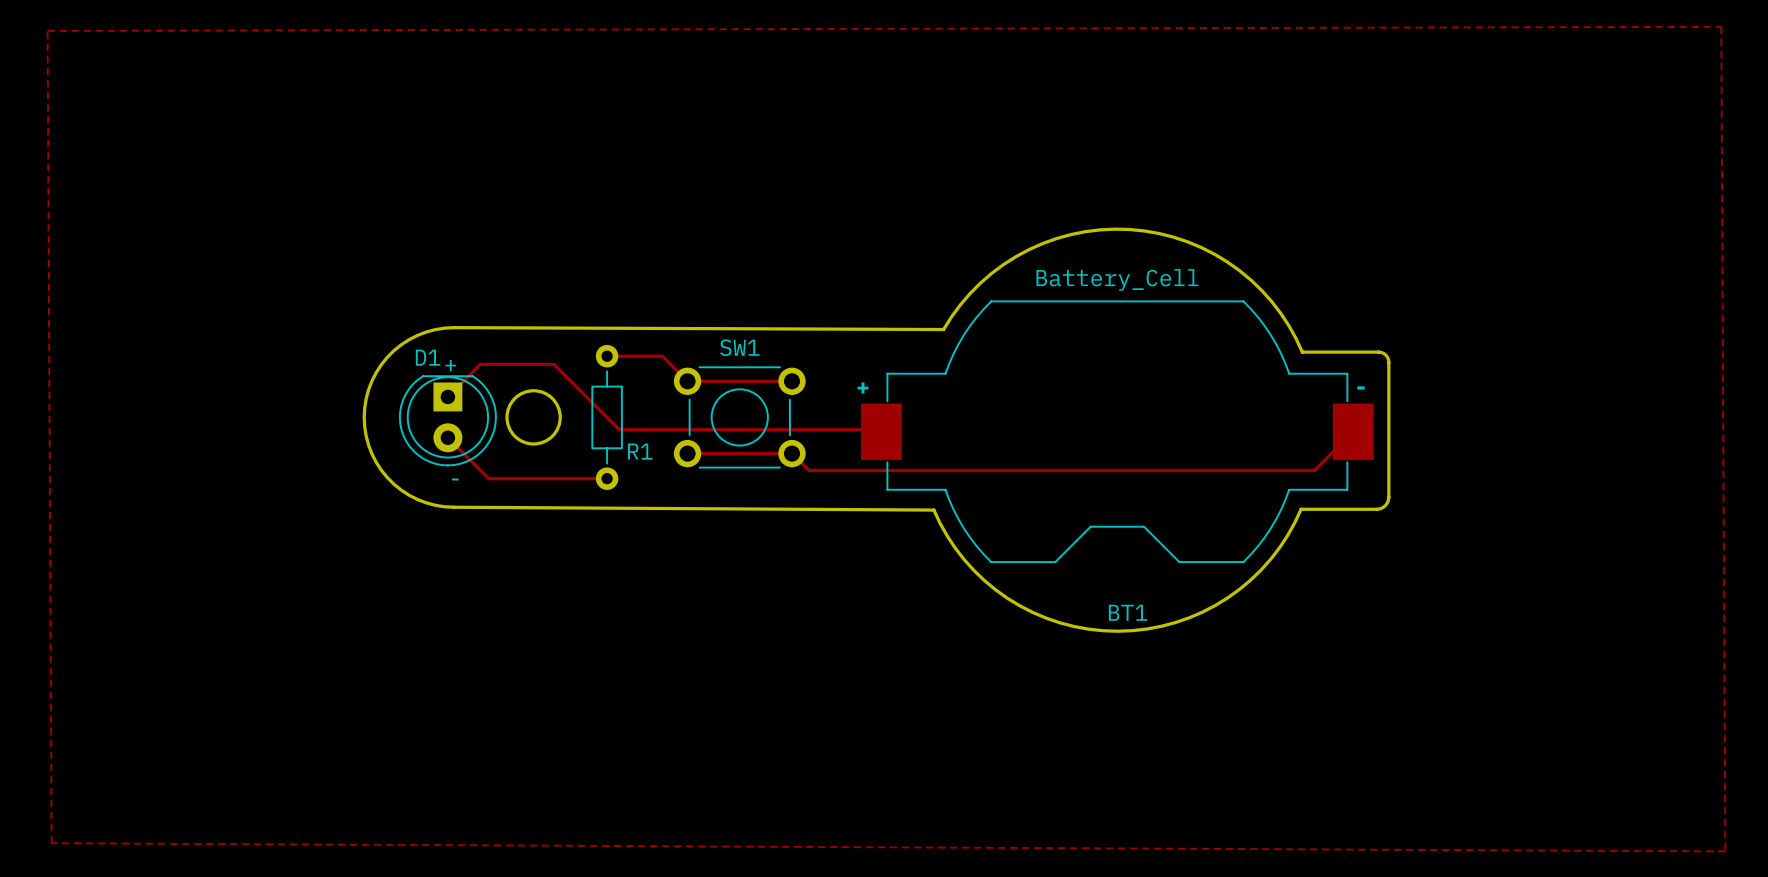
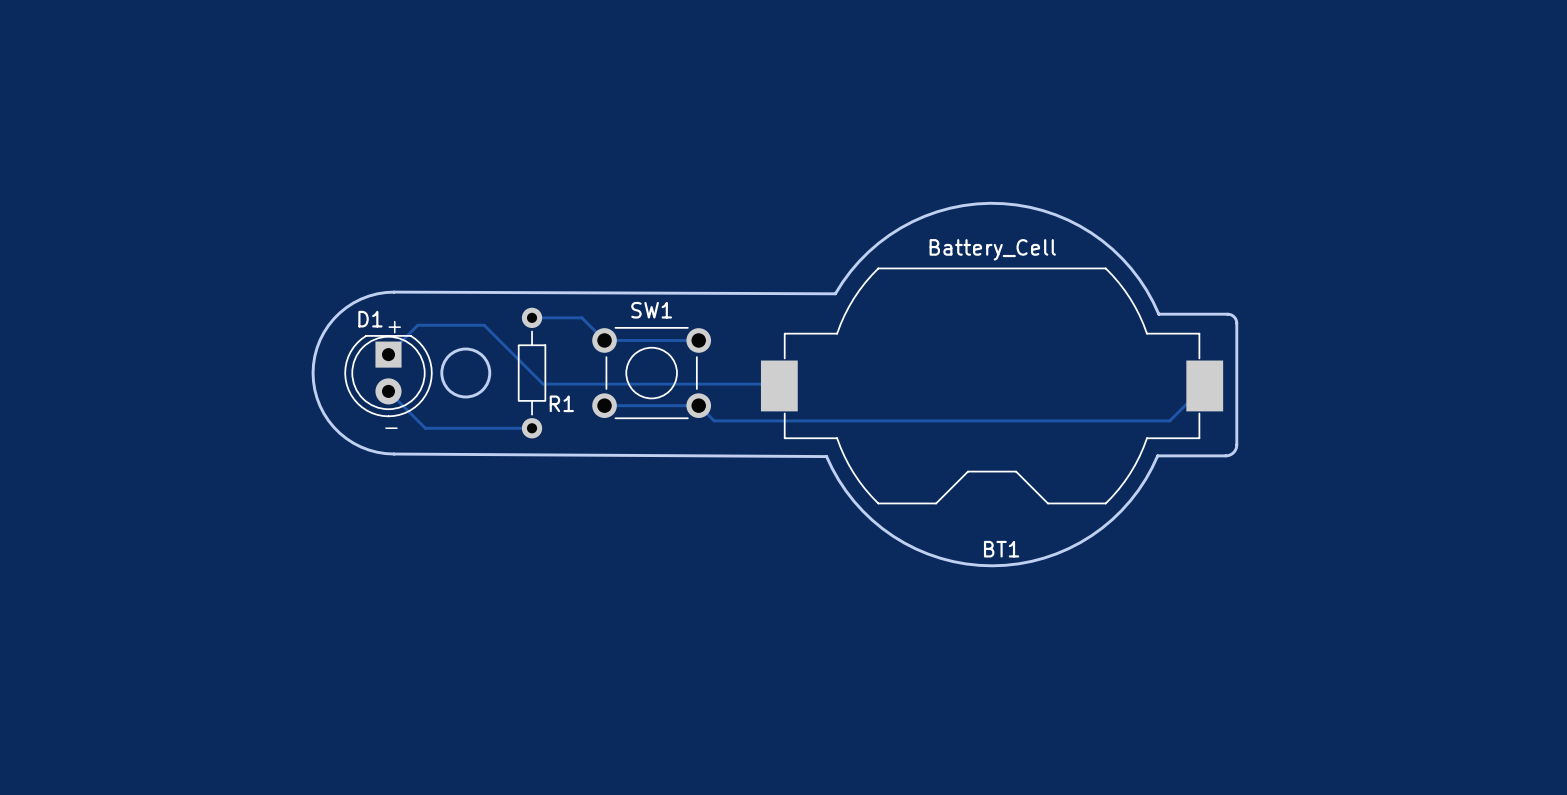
zone outline: (1721, 26) (47, 30) (51, 843) (1725, 851) (1721, 26) -> none
text: + (863, 388) -> none
text: - (1361, 388) -> none

